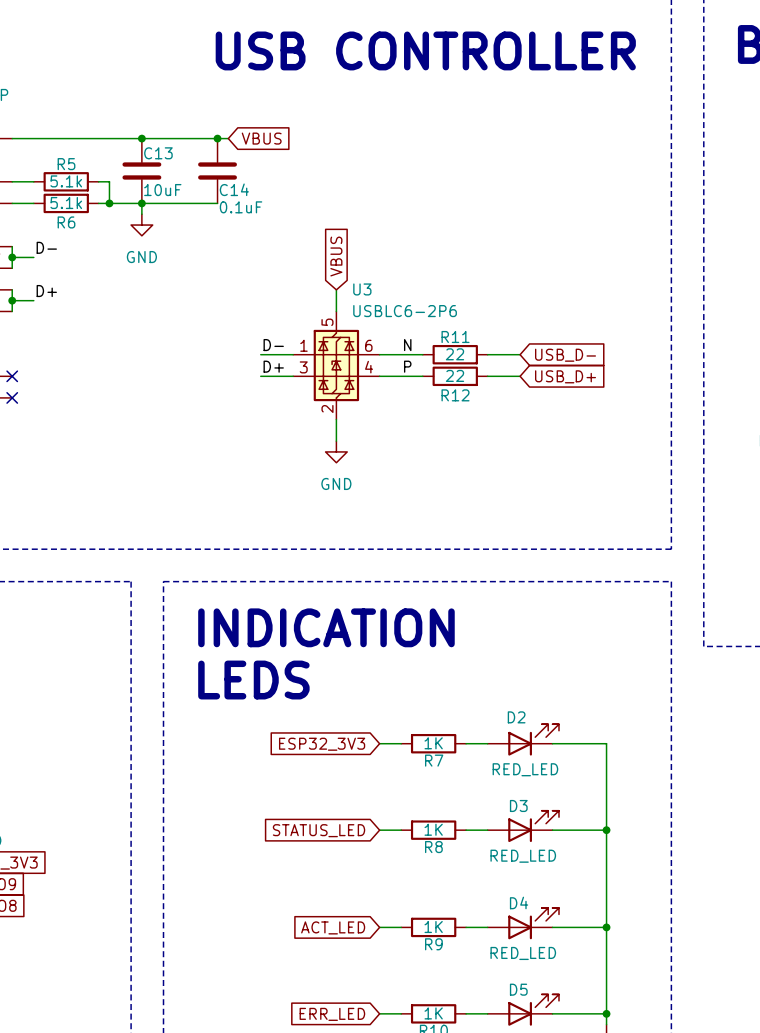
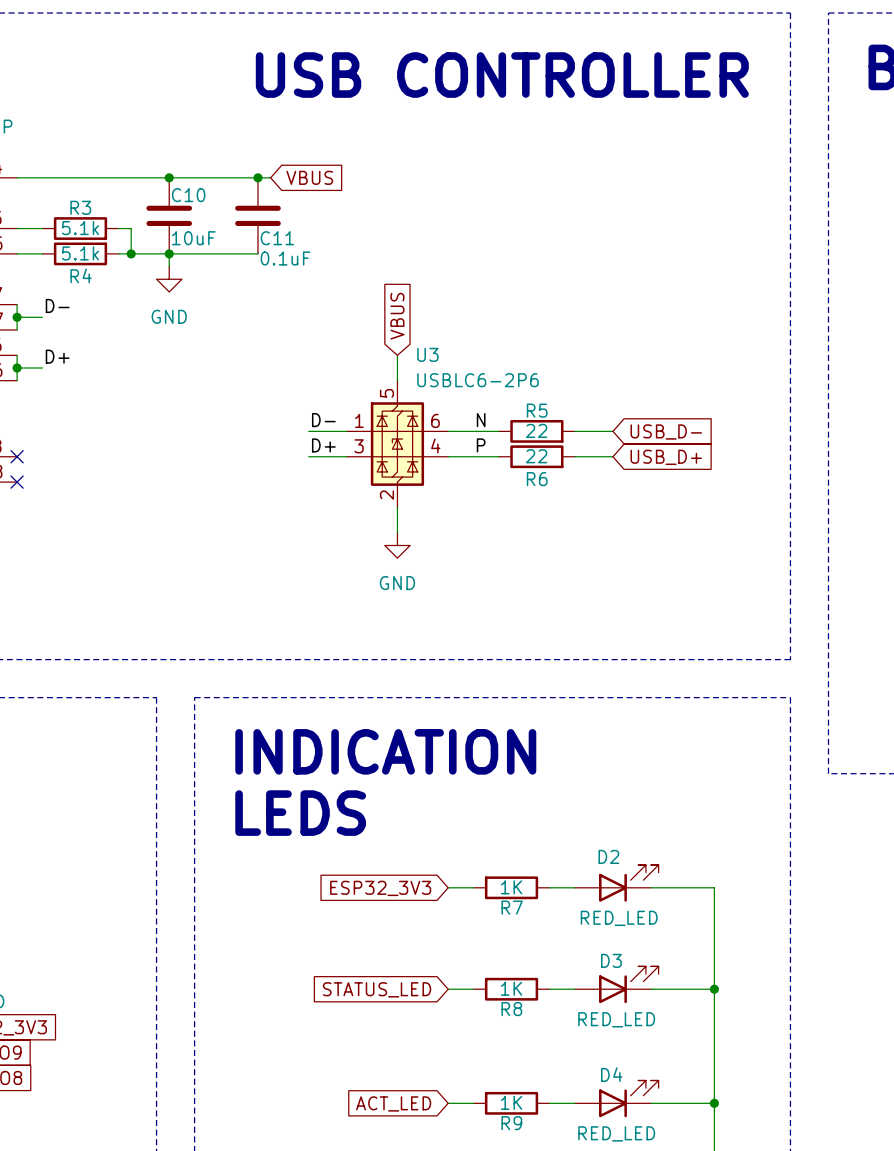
C13 name: C13 (158, 153) -> C10 (188, 195)
R5 name: R5 (66, 164) -> R3 (80, 207)
C14 name: C14 (234, 189) -> C11 (277, 238)
R6 name: R6 (66, 222) -> R4 (81, 275)
R11 name: R11 (455, 337) -> R5 (537, 410)
R12 name: R12 (455, 395) -> R6 (537, 479)

